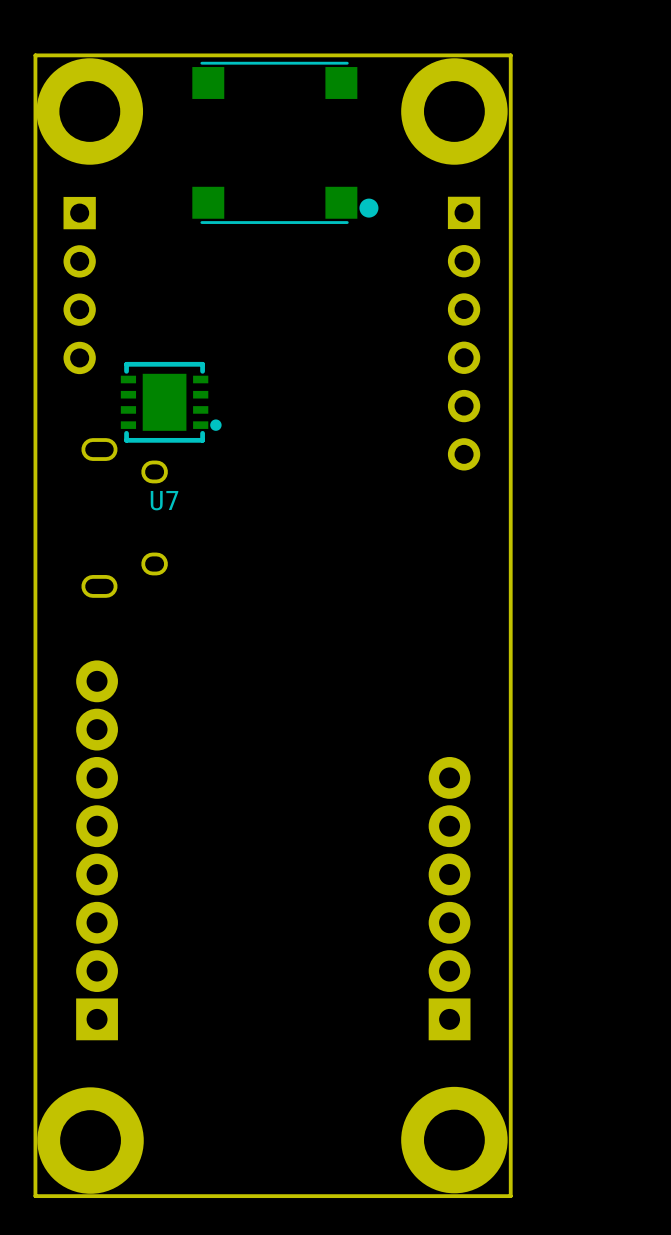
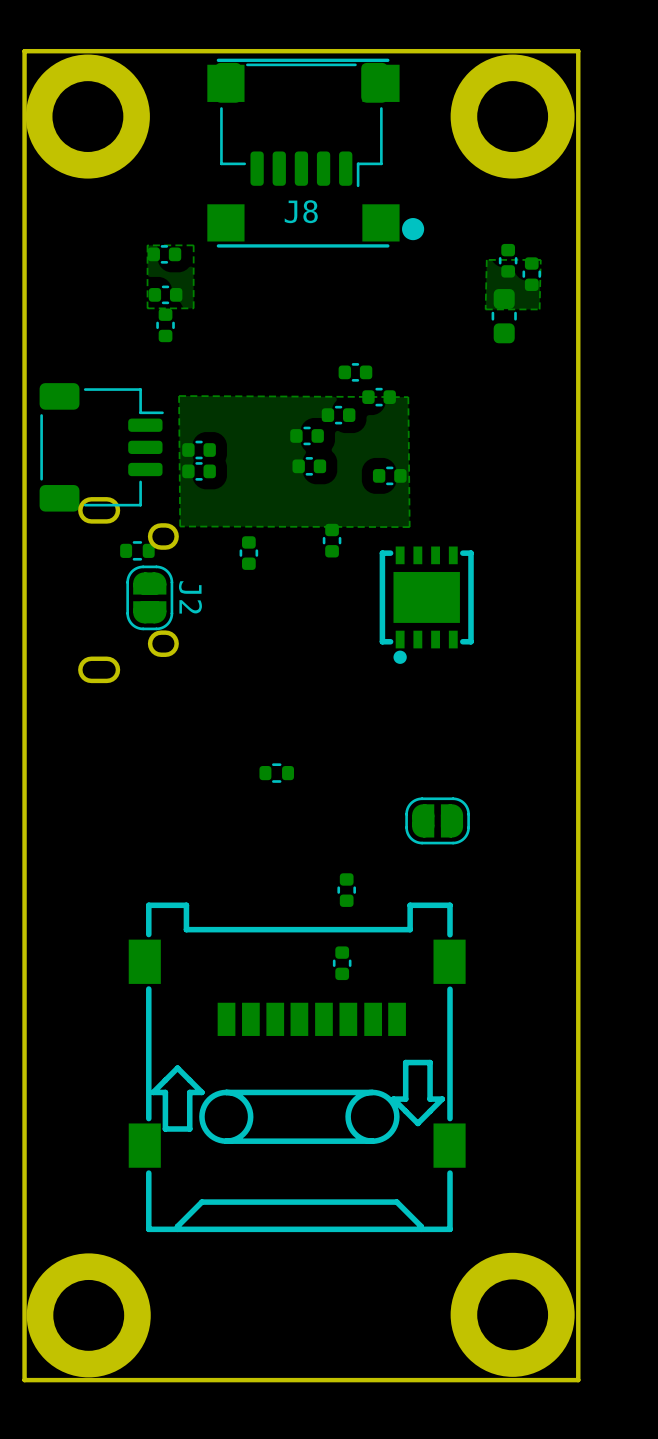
J8: none -> (301, 124)
zone outline: none -> (193, 245) (193, 308) (147, 308) (147, 245) (193, 245)
part: none -> (164, 254)
zone outline: none -> (540, 259) (486, 259) (485, 309) (539, 309) (540, 259)
part: none -> (508, 260)
part: none -> (531, 274)
part: none -> (165, 294)
part: none -> (504, 316)
part: (79, 285) -> none
part: none -> (165, 325)
part: none -> (355, 372)
part: (464, 333) -> none
zone outline: none -> (179, 396) (180, 526) (409, 527) (408, 397) (179, 396)
part: none -> (379, 397)
part: none -> (338, 415)
part: none -> (307, 435)
part: none -> (101, 447)
part: none -> (199, 450)
U7: (171, 402) -> none
part: none -> (309, 466)
part: none -> (199, 471)
part: none -> (389, 475)
part: none -> (332, 540)
part: none -> (137, 550)
part: none -> (248, 553)
J2: none -> (149, 597)
part: none -> (426, 605)
part: none -> (276, 773)
part: none -> (437, 820)
part: none -> (346, 890)
part: none -> (342, 963)
part: (97, 850) -> none
part: (449, 898) -> none
part: none -> (297, 1067)

